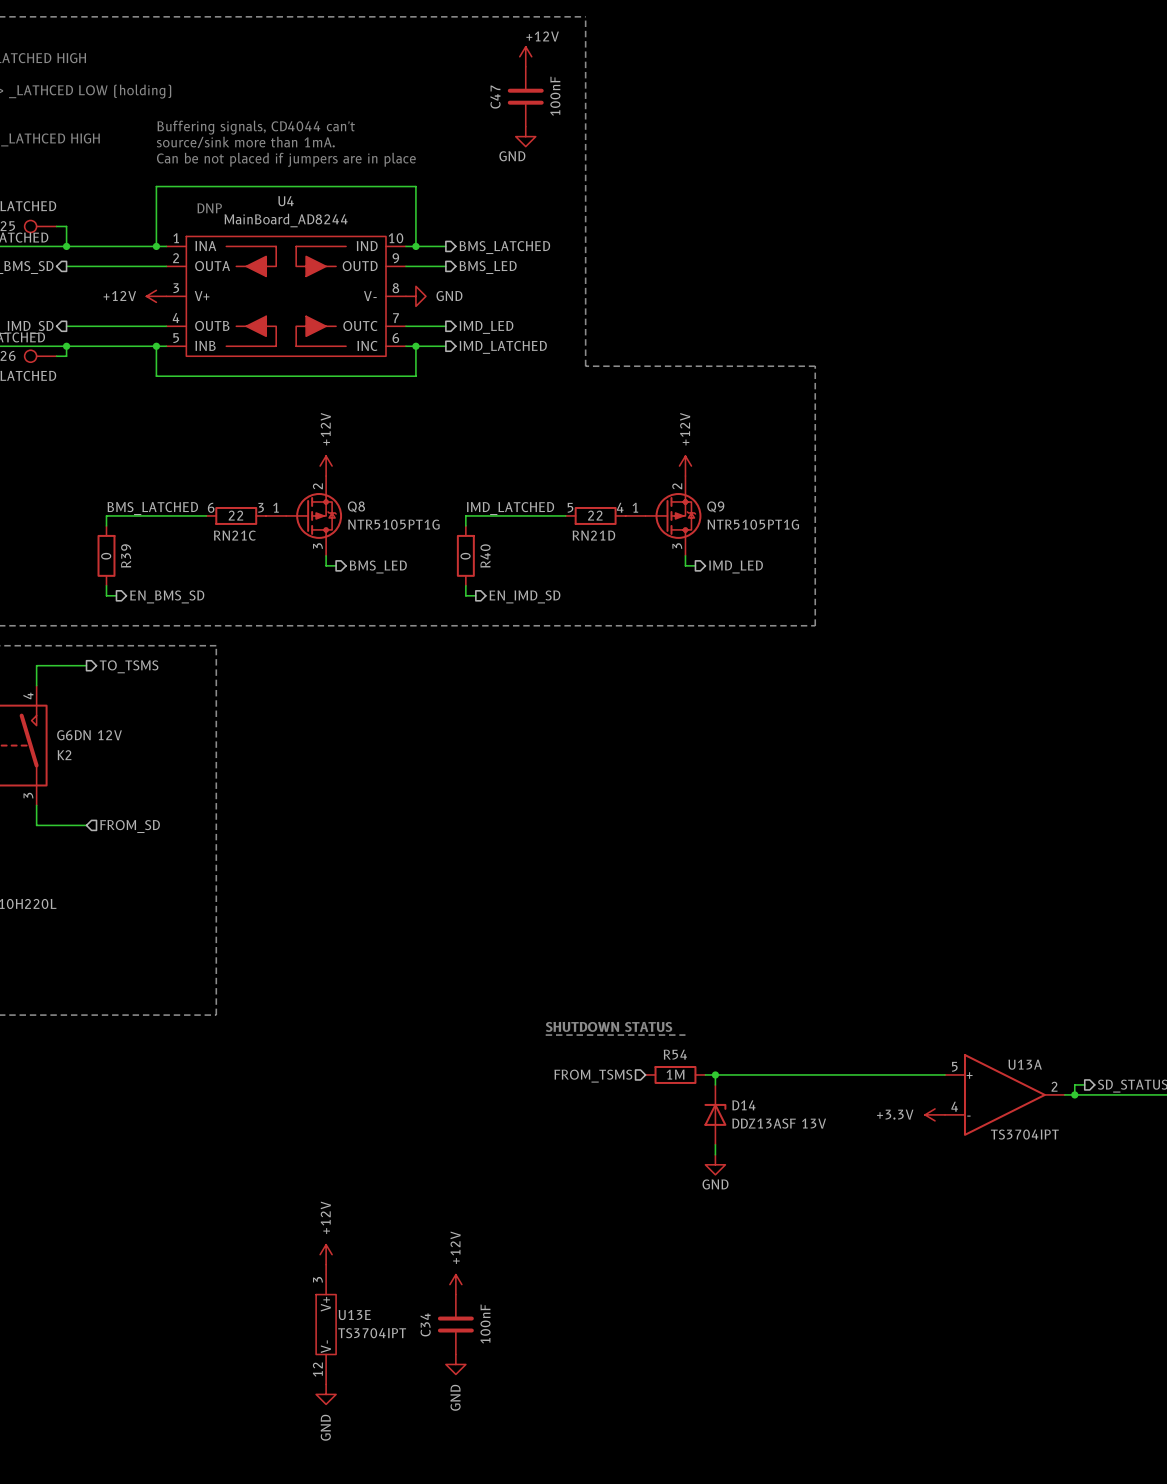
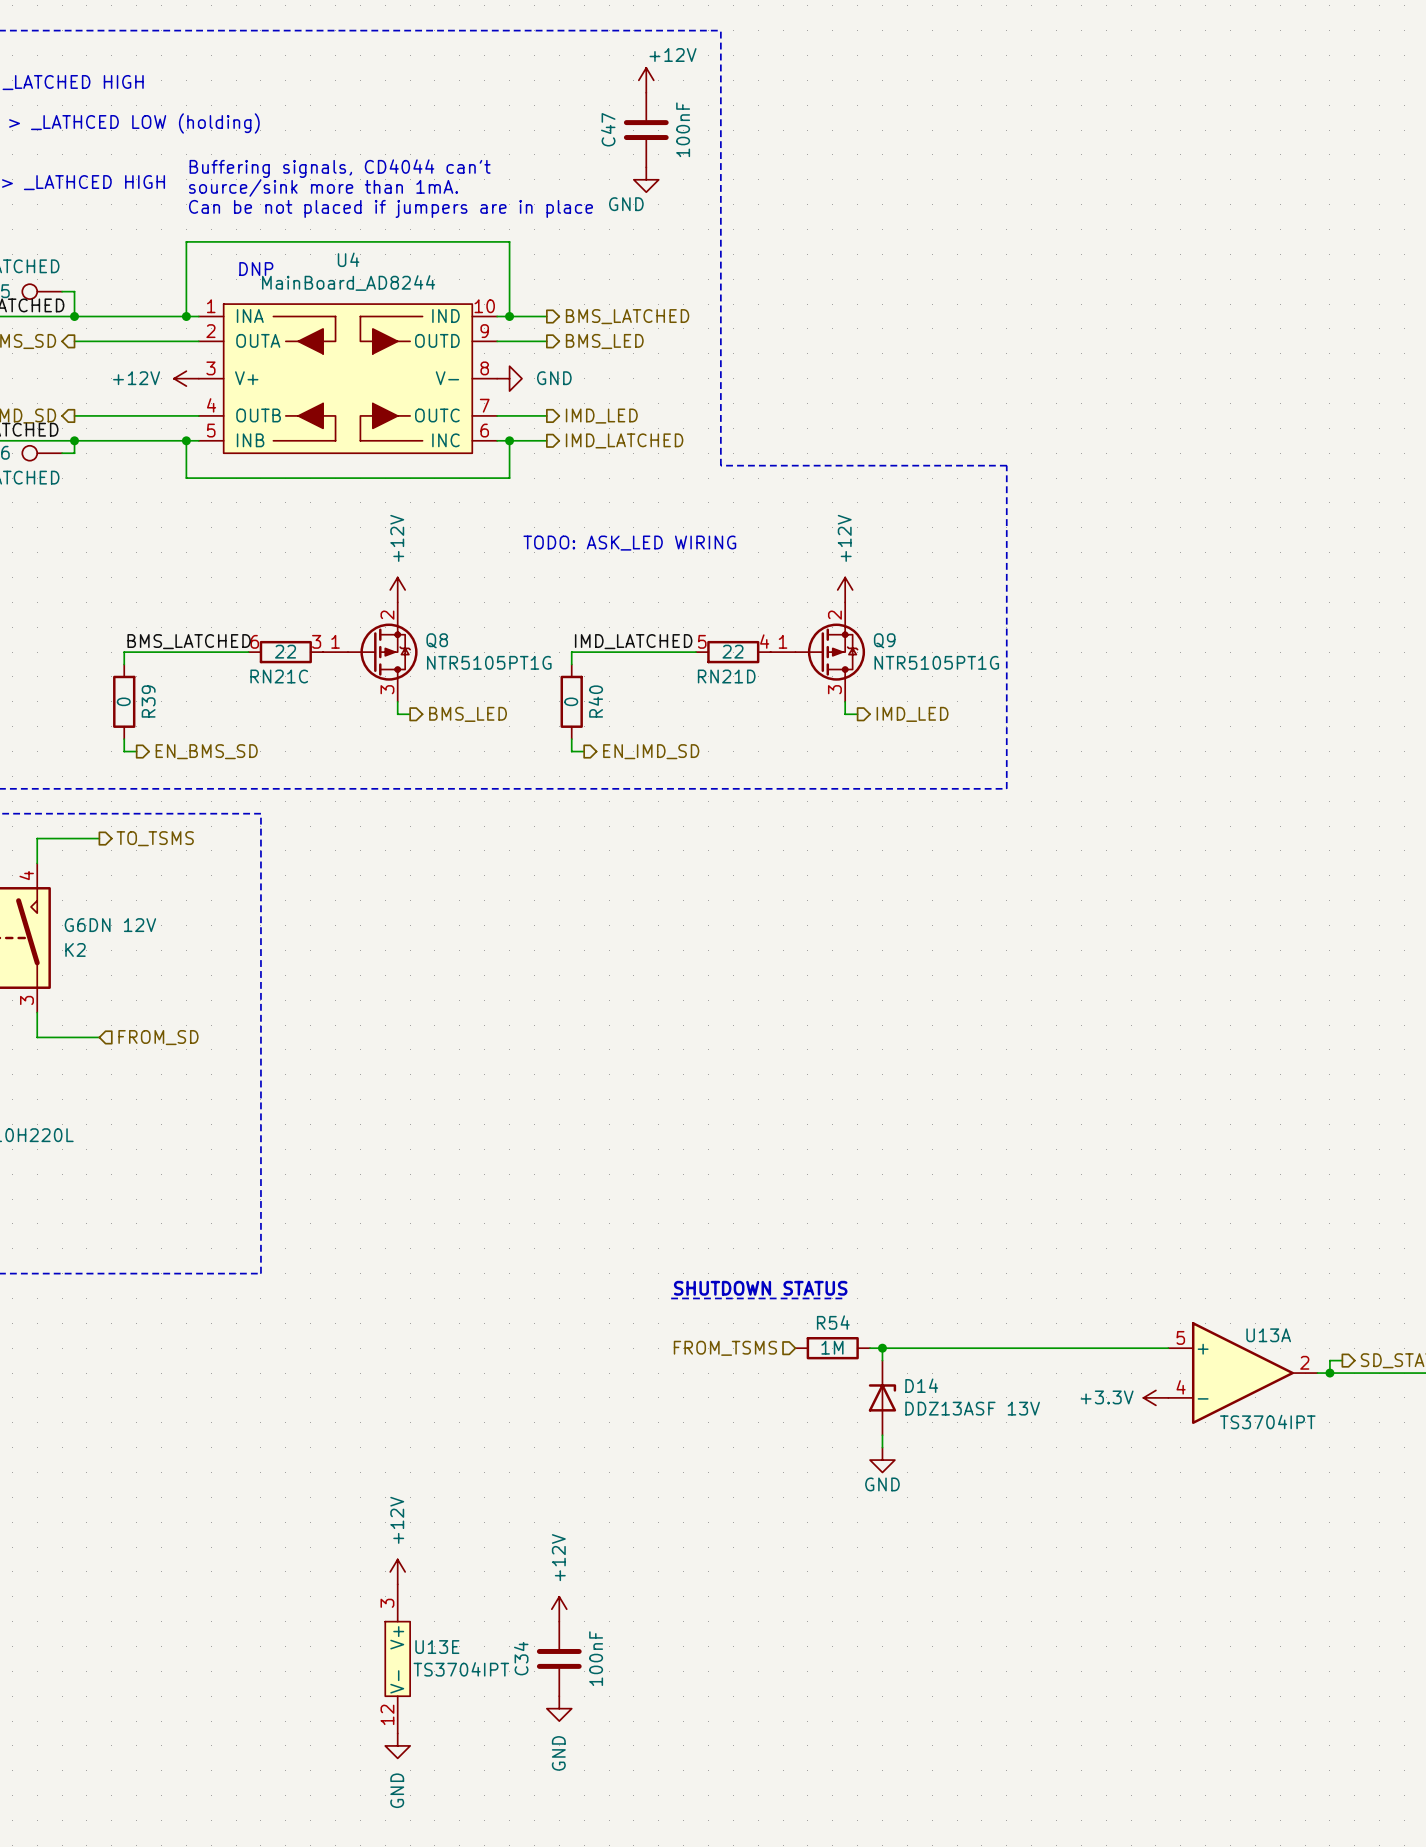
text: none -> TODO: ASK_LED WIRING (629, 543)

